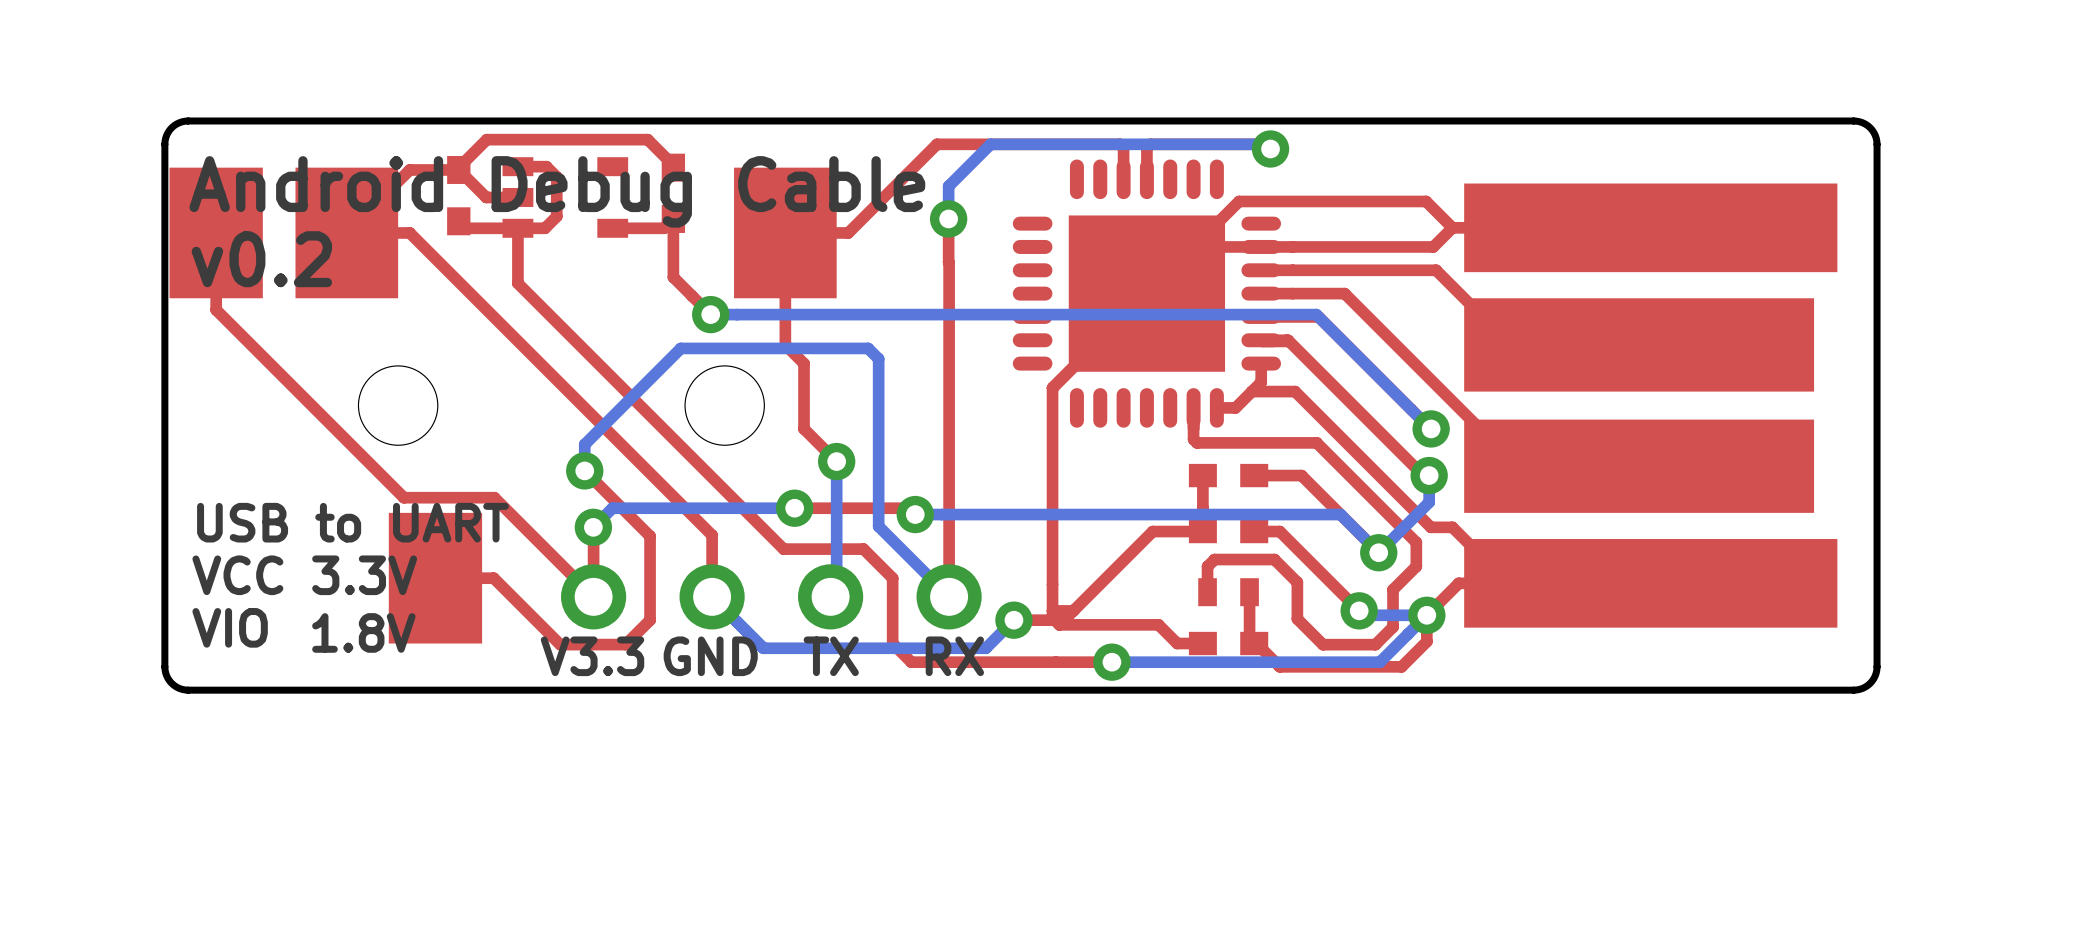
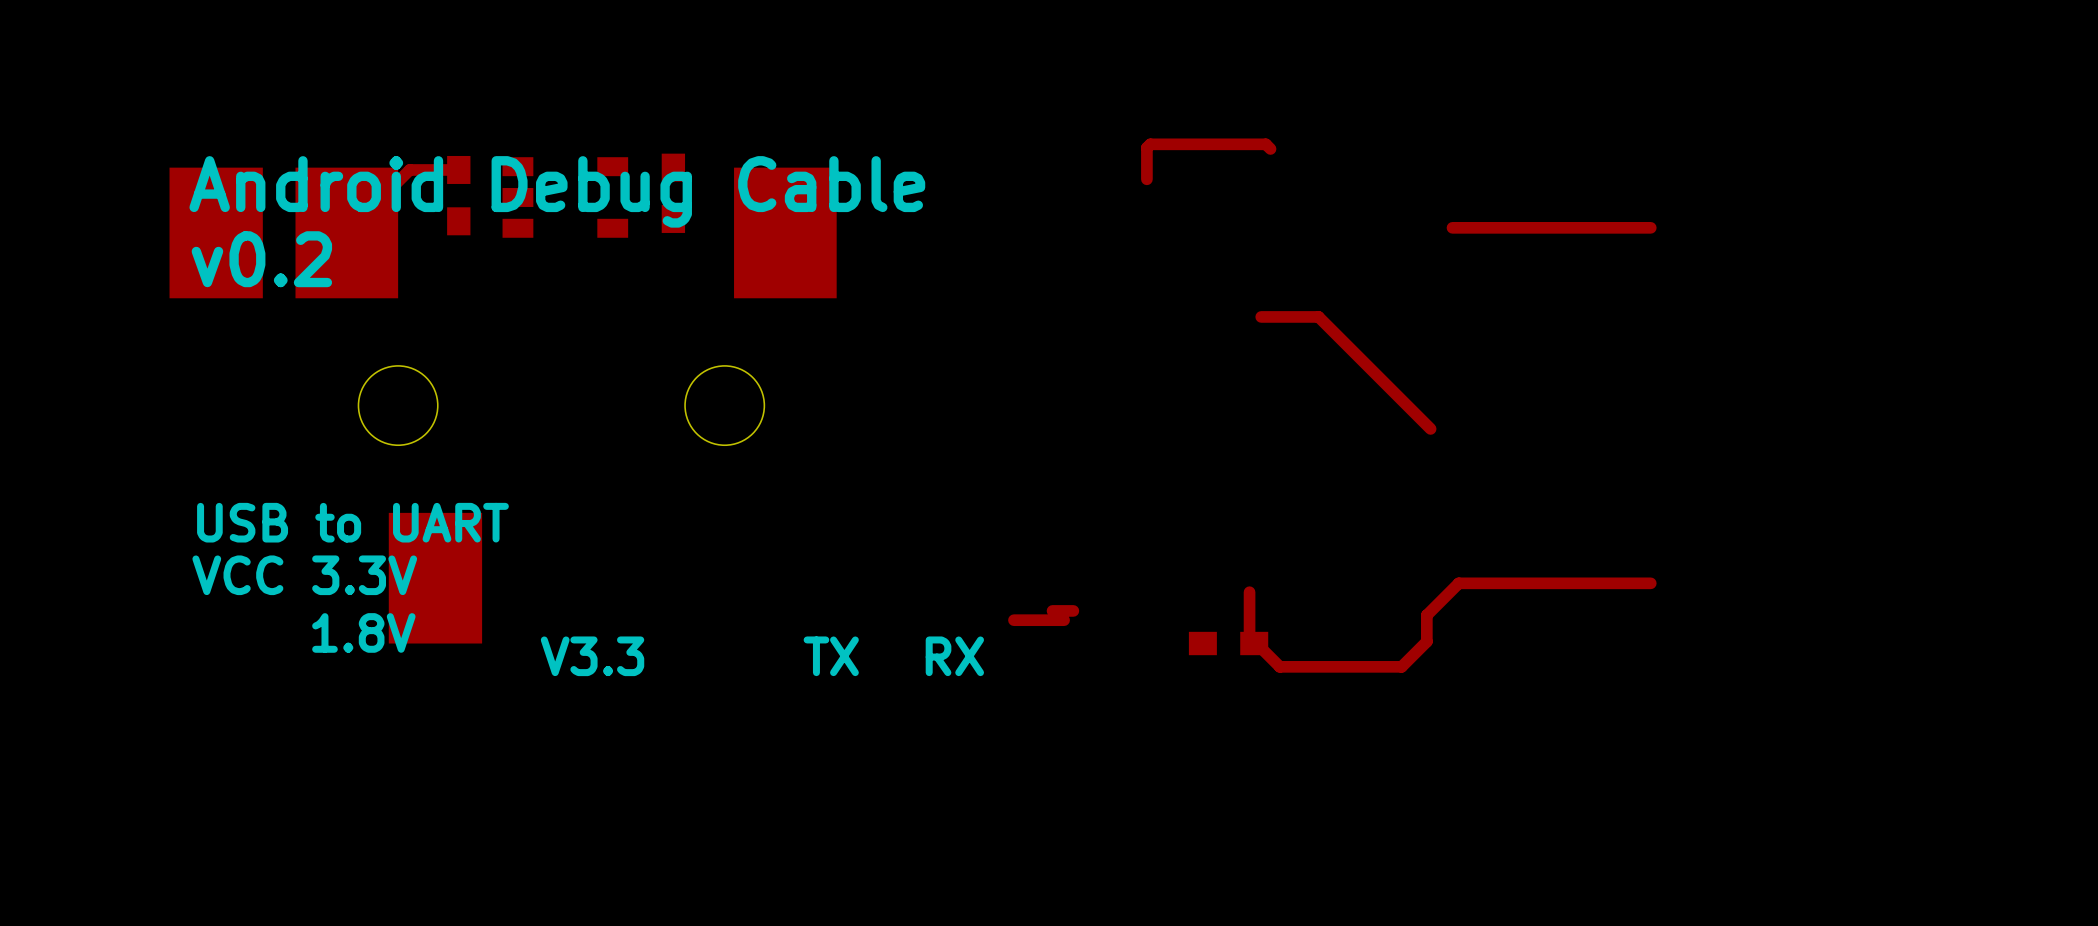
board edge: (1853, 120) (182, 121) (169, 130) (164, 144) (165, 672) (173, 685) (188, 690) (1859, 689) (1872, 681) (1877, 666) (1877, 144) (1875, 135) (1870, 127) (1862, 122) (1853, 120) -> none
bottom track: (1270, 148) (1265, 144) (990, 144) (948, 186) (948, 218) -> none
via: (1270, 148) -> none
top track: (517, 166) (546, 166) (556, 176) (556, 216) (545, 228) (465, 228) (458, 221) -> none
top track: (673, 167) (673, 165) (647, 139) (486, 139) (458, 167) (458, 169) (486, 197) (517, 197) -> none
top track: (1123, 179) (1123, 147) (1120, 144) (936, 144) (848, 232) (785, 232) (785, 344) (804, 363) (804, 428) (836, 461) -> none
top track: (346, 218) (346, 232) (409, 232) (712, 535) (712, 596) -> none
top track: (948, 218) (948, 262) -> none
via: (948, 218) -> none
top track: (517, 228) (517, 283) (783, 549) (863, 549) (892, 578) (892, 643) (911, 662) (1111, 662) -> none
top track: (612, 228) (664, 228) (673, 218) (673, 277) (710, 314) -> none
top track: (216, 232) (216, 309) (403, 497) (494, 497) (593, 596) (593, 527) -> none
top track: (1193, 246) (1433, 246) (1452, 227) (1426, 201) (1239, 201) (1052, 387) (1052, 617) (1059, 624) -> none
top track: (949, 262) (949, 596) -> none
top track: (1261, 270) (1436, 270) (1510, 344) (1639, 344) -> none
part: (1146, 293) -> none
top track: (1261, 293) (1344, 293) (1517, 466) (1639, 466) -> none
bottom track: (710, 314) (1316, 314) (1430, 428) -> none
via: (710, 314) -> none
top track: (1287, 341) (1261, 340) (1288, 340) (1423, 475) (1429, 475) -> none
top track: (1261, 363) (1261, 382) (1235, 407) (1216, 407) -> none
top track: (1251, 391) (1295, 391) (1430, 527) (1452, 527) (1508, 583) -> none
part: (1650, 405) -> none
top track: (1193, 407) (1193, 439) (1197, 442) (1316, 442) (1416, 542) (1416, 566) (1393, 589) (1393, 627) (1375, 644) (1323, 644) (1297, 619) (1297, 582) (1274, 559) (1214, 559) (1207, 566) (1207, 592) -> none
via: (1431, 428) -> none
bottom track: (836, 461) (836, 590) (830, 596) -> none
via: (836, 461) -> none
bottom track: (584, 470) (584, 444) (680, 348) (868, 348) (878, 358) (878, 526) (949, 596) -> none
top track: (584, 470) (650, 536) (650, 620) (625, 644) (560, 644) (493, 578) (435, 578) -> none
via: (584, 470) -> none
top track: (1202, 475) (1202, 531) (1152, 531) (1059, 624) -> none
part: (1228, 475) -> none
top track: (1254, 475) (1301, 475) (1378, 552) -> none
bottom track: (1429, 475) (1429, 502) (1378, 552) (1340, 514) (915, 514) -> none
via: (1429, 475) -> none
bottom track: (794, 508) (612, 508) (593, 527) -> none
top track: (794, 508) (908, 508) (915, 514) -> none
via: (794, 508) -> none
via: (915, 514) -> none
via: (593, 527) -> none
part: (1228, 531) -> none
top track: (1254, 531) (1279, 531) (1359, 610) -> none
via: (1378, 552) -> none
part: (1228, 592) -> none
bottom track: (712, 596) (763, 648) (985, 648) (1013, 620) -> none
part: (771, 596) -> none
bottom track: (1359, 610) (1363, 615) (1426, 615) -> none
via: (1359, 610) -> none
bottom track: (1426, 615) (1379, 662) (1111, 662) -> none
via: (1426, 615) -> none
via: (1013, 620) -> none
top track: (1059, 624) (1158, 624) (1177, 643) (1202, 643) -> none
text: VIO (230, 627) -> none
text: GND (710, 656) -> none
via: (1111, 662) -> none

